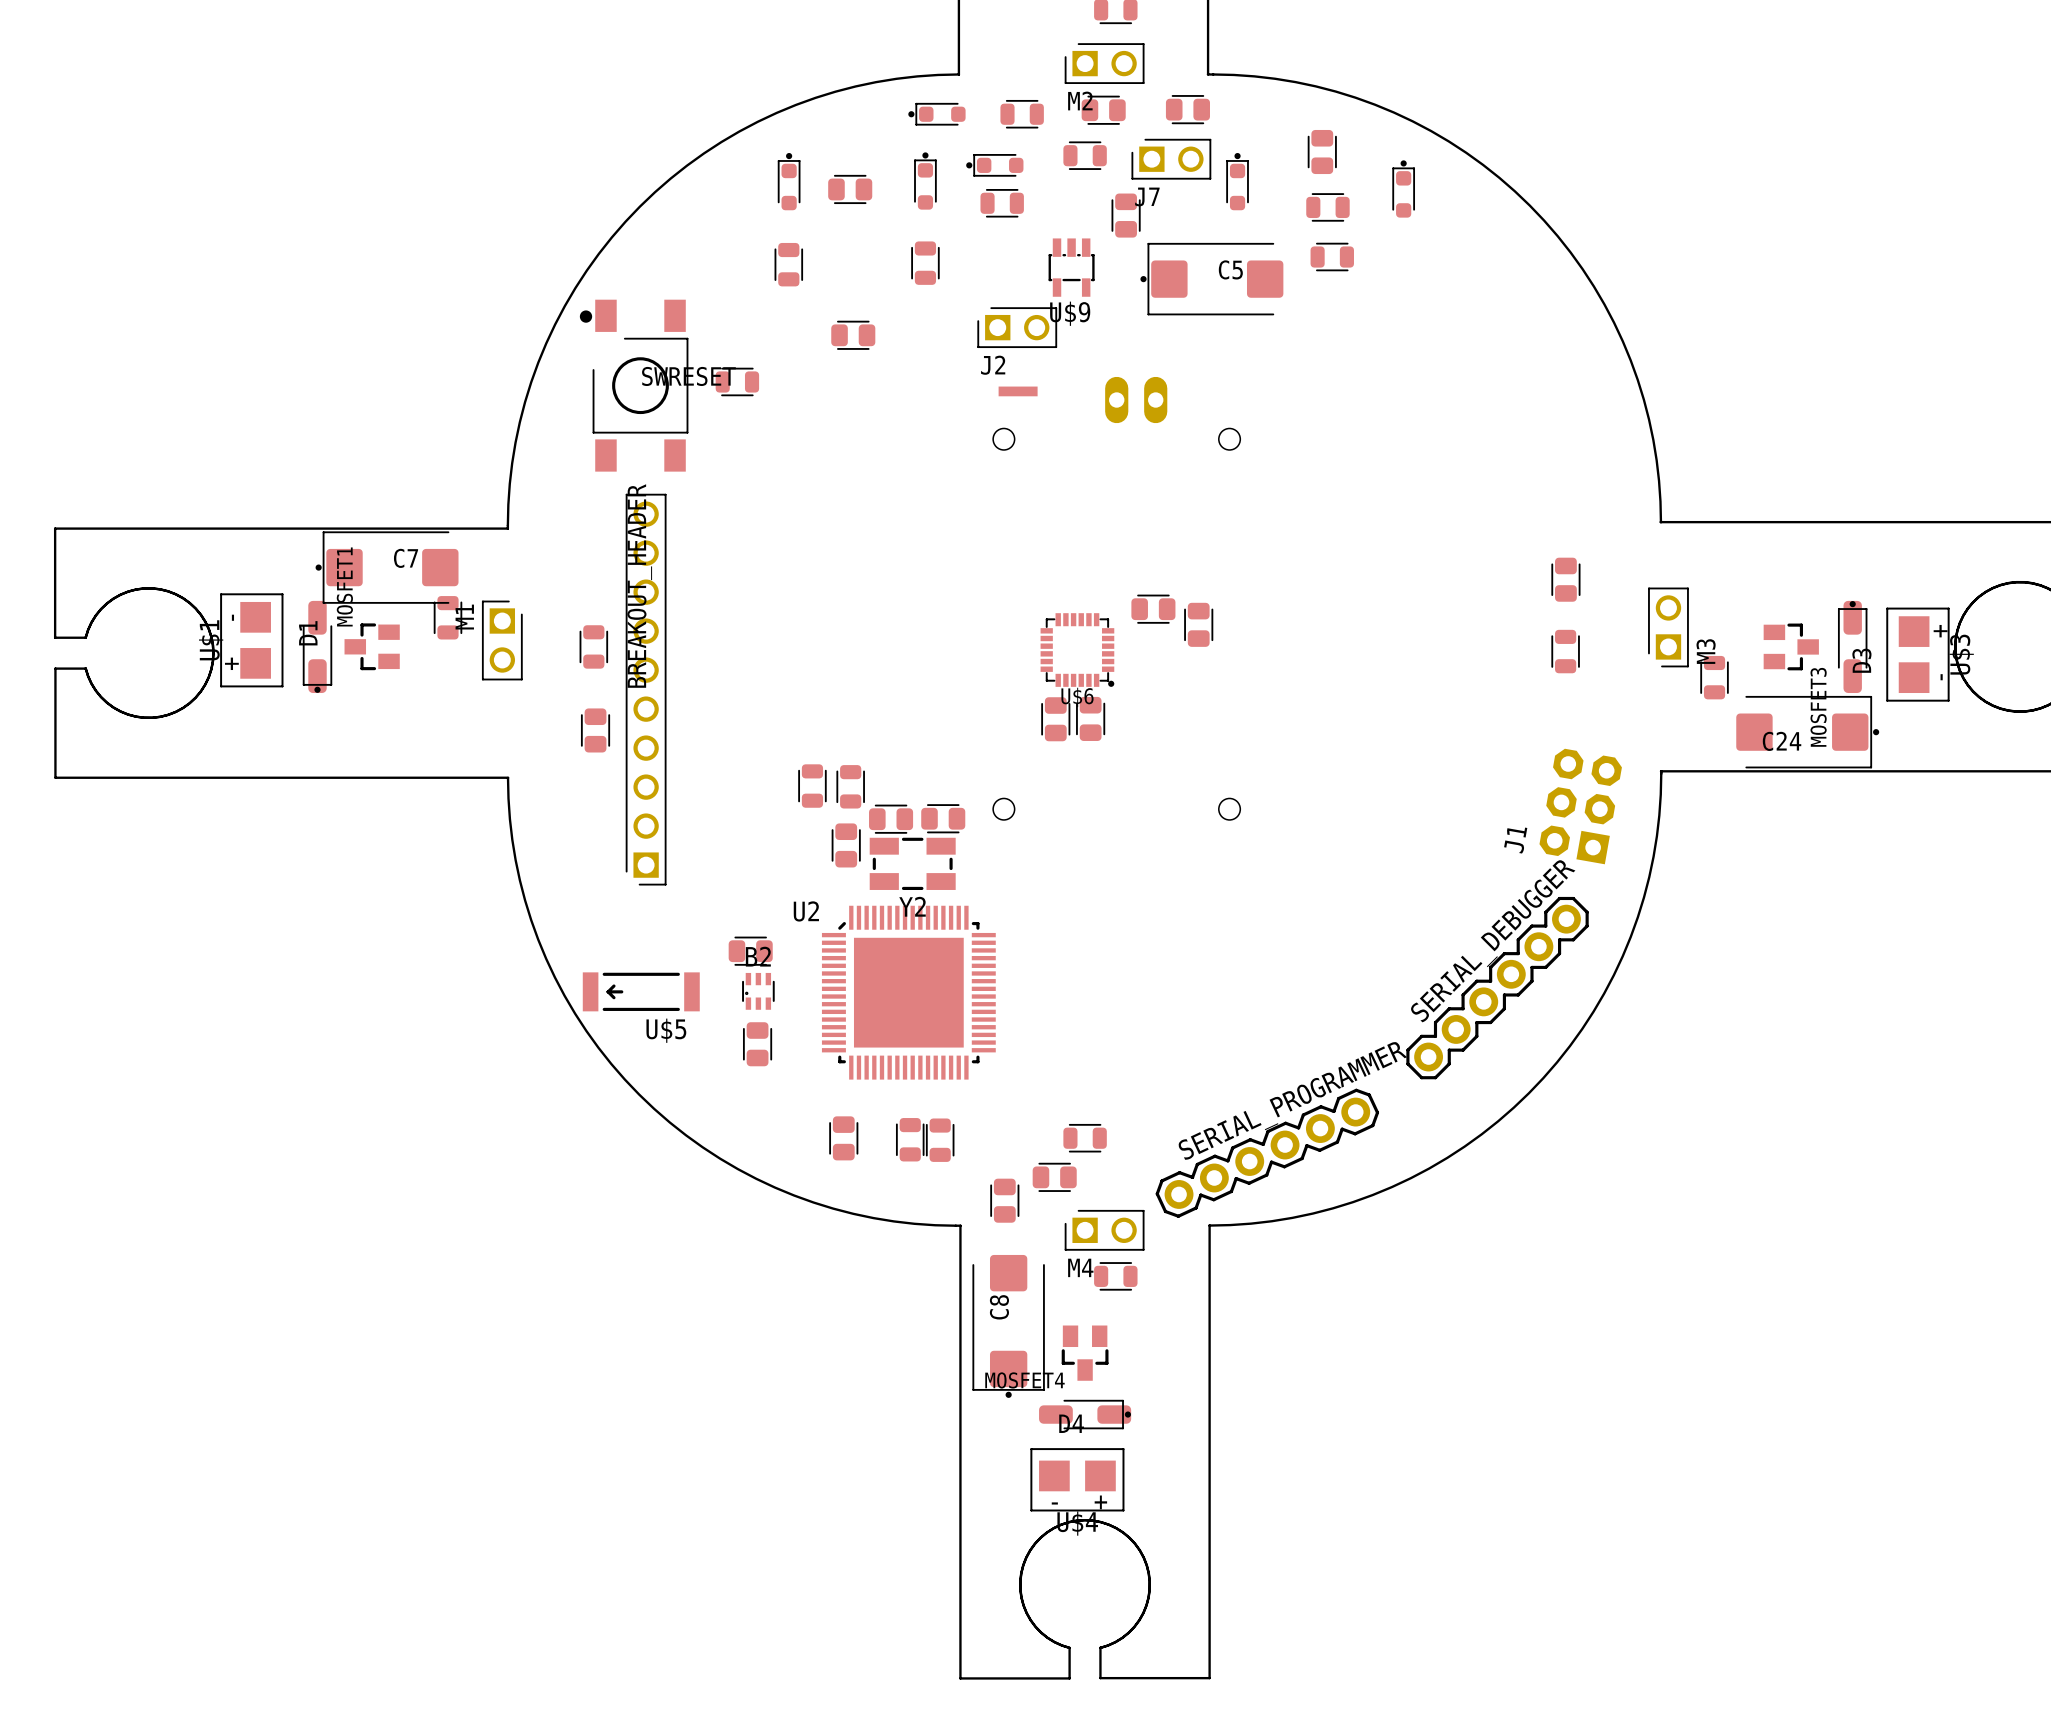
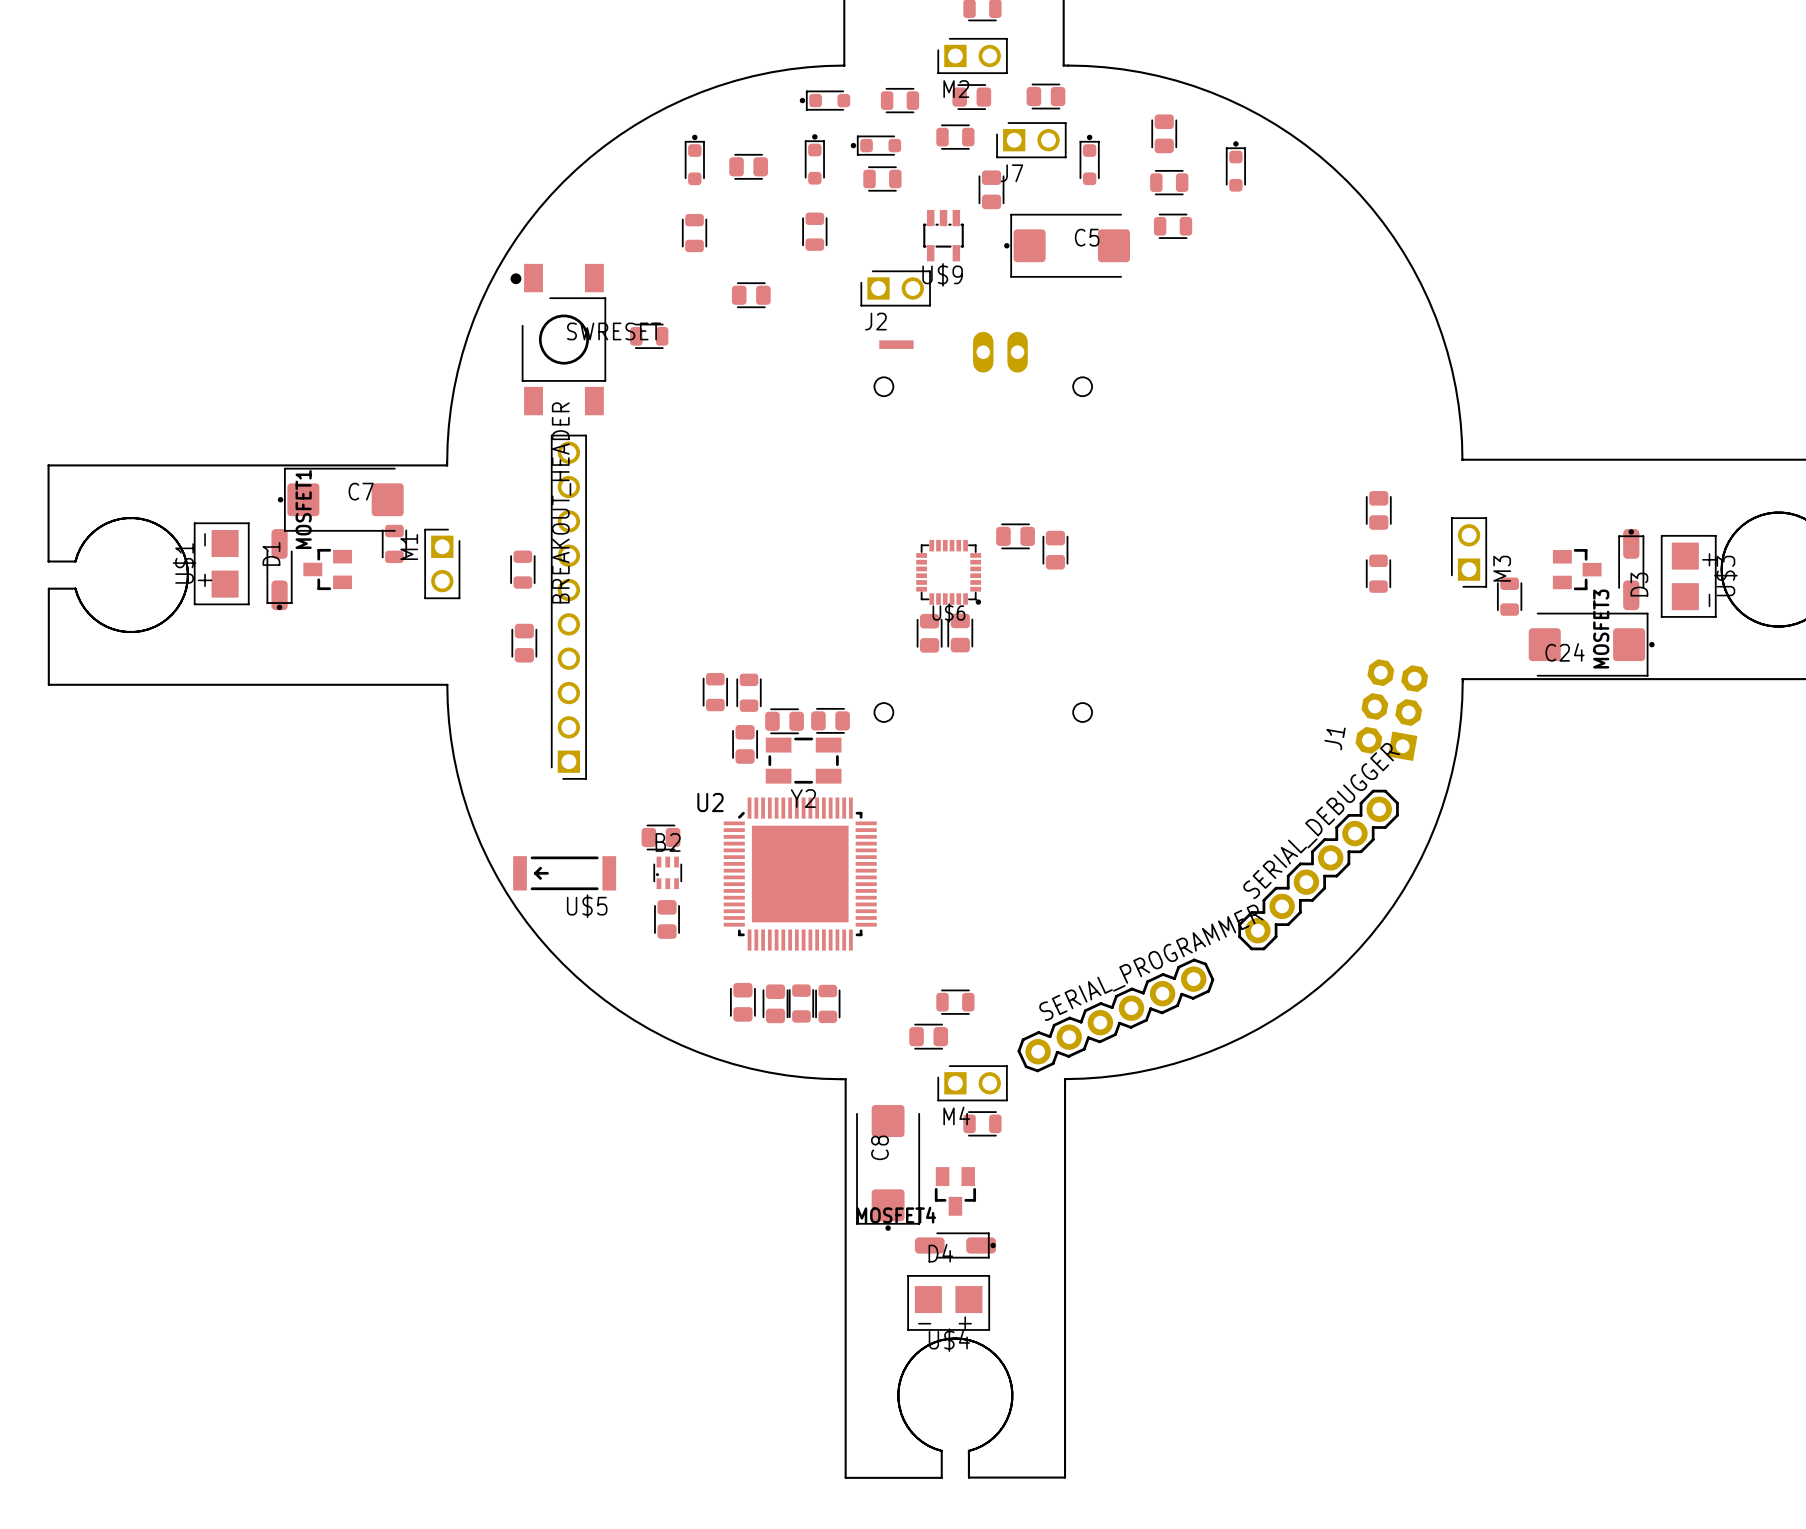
part position: (1004, 1200) -> (775, 1003)

